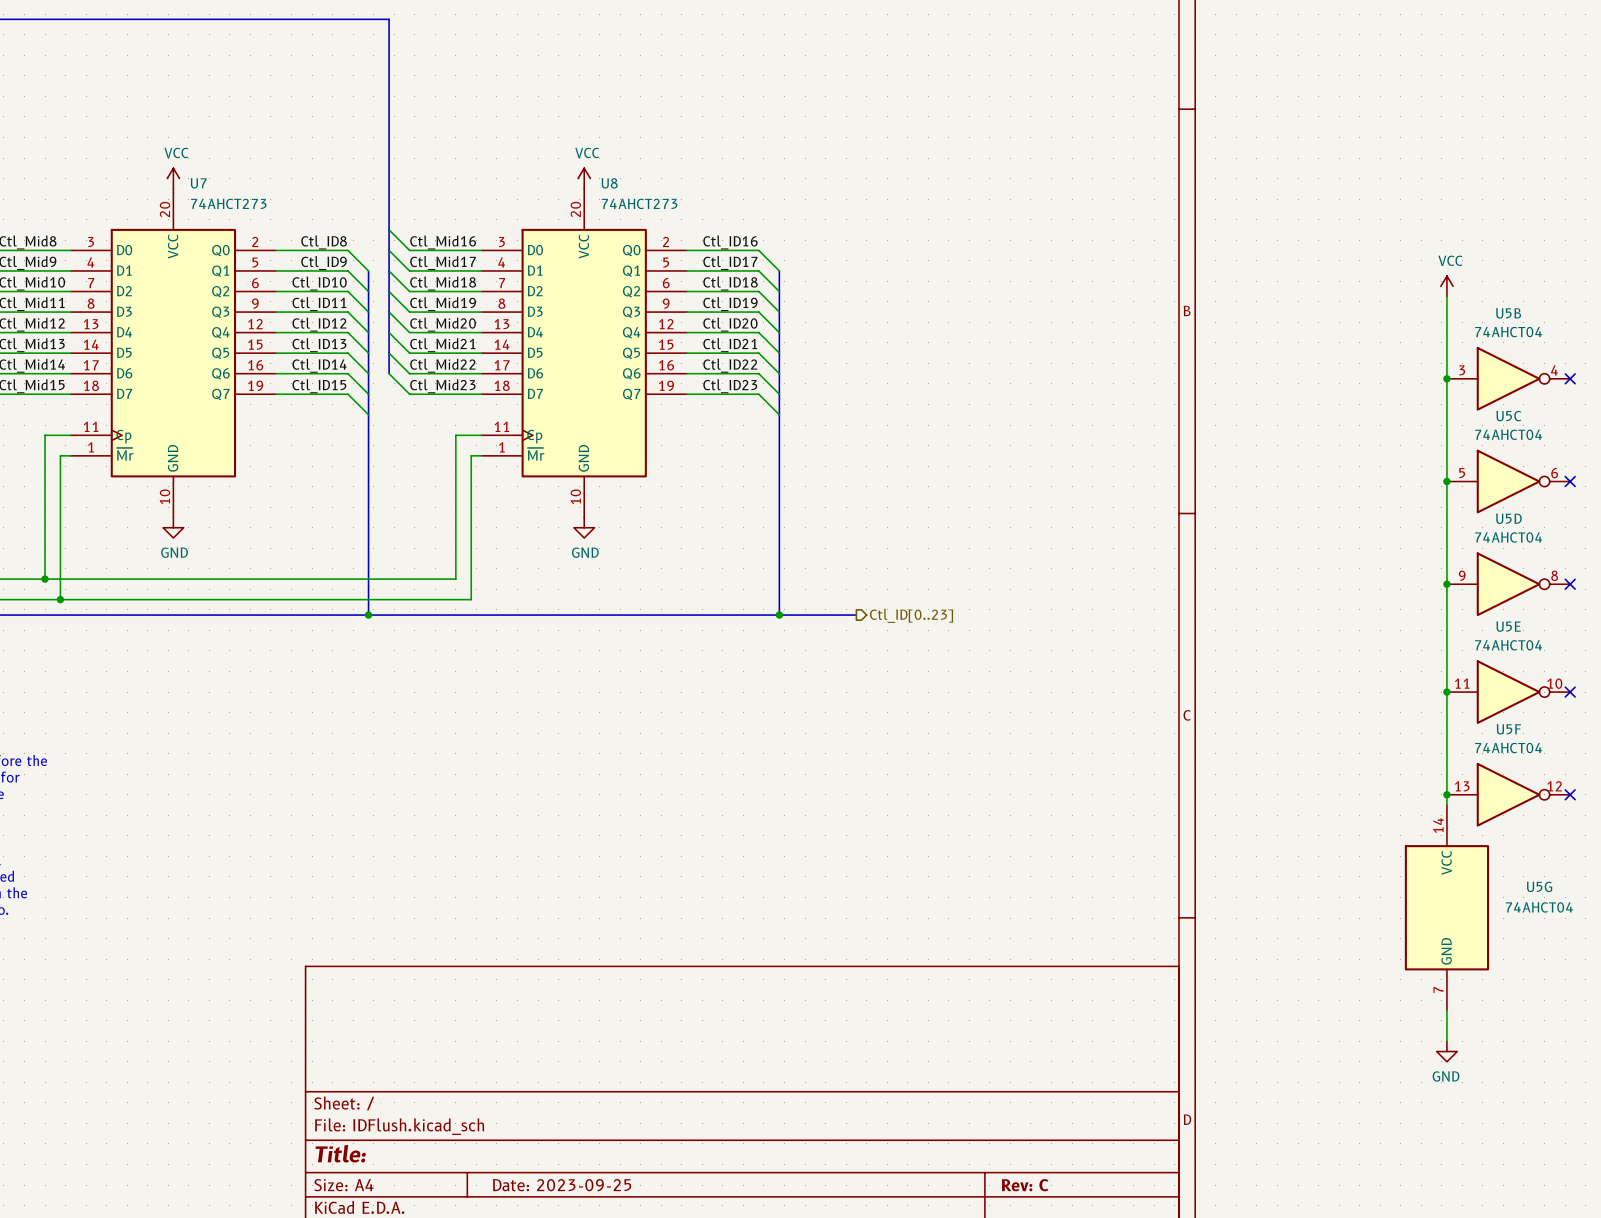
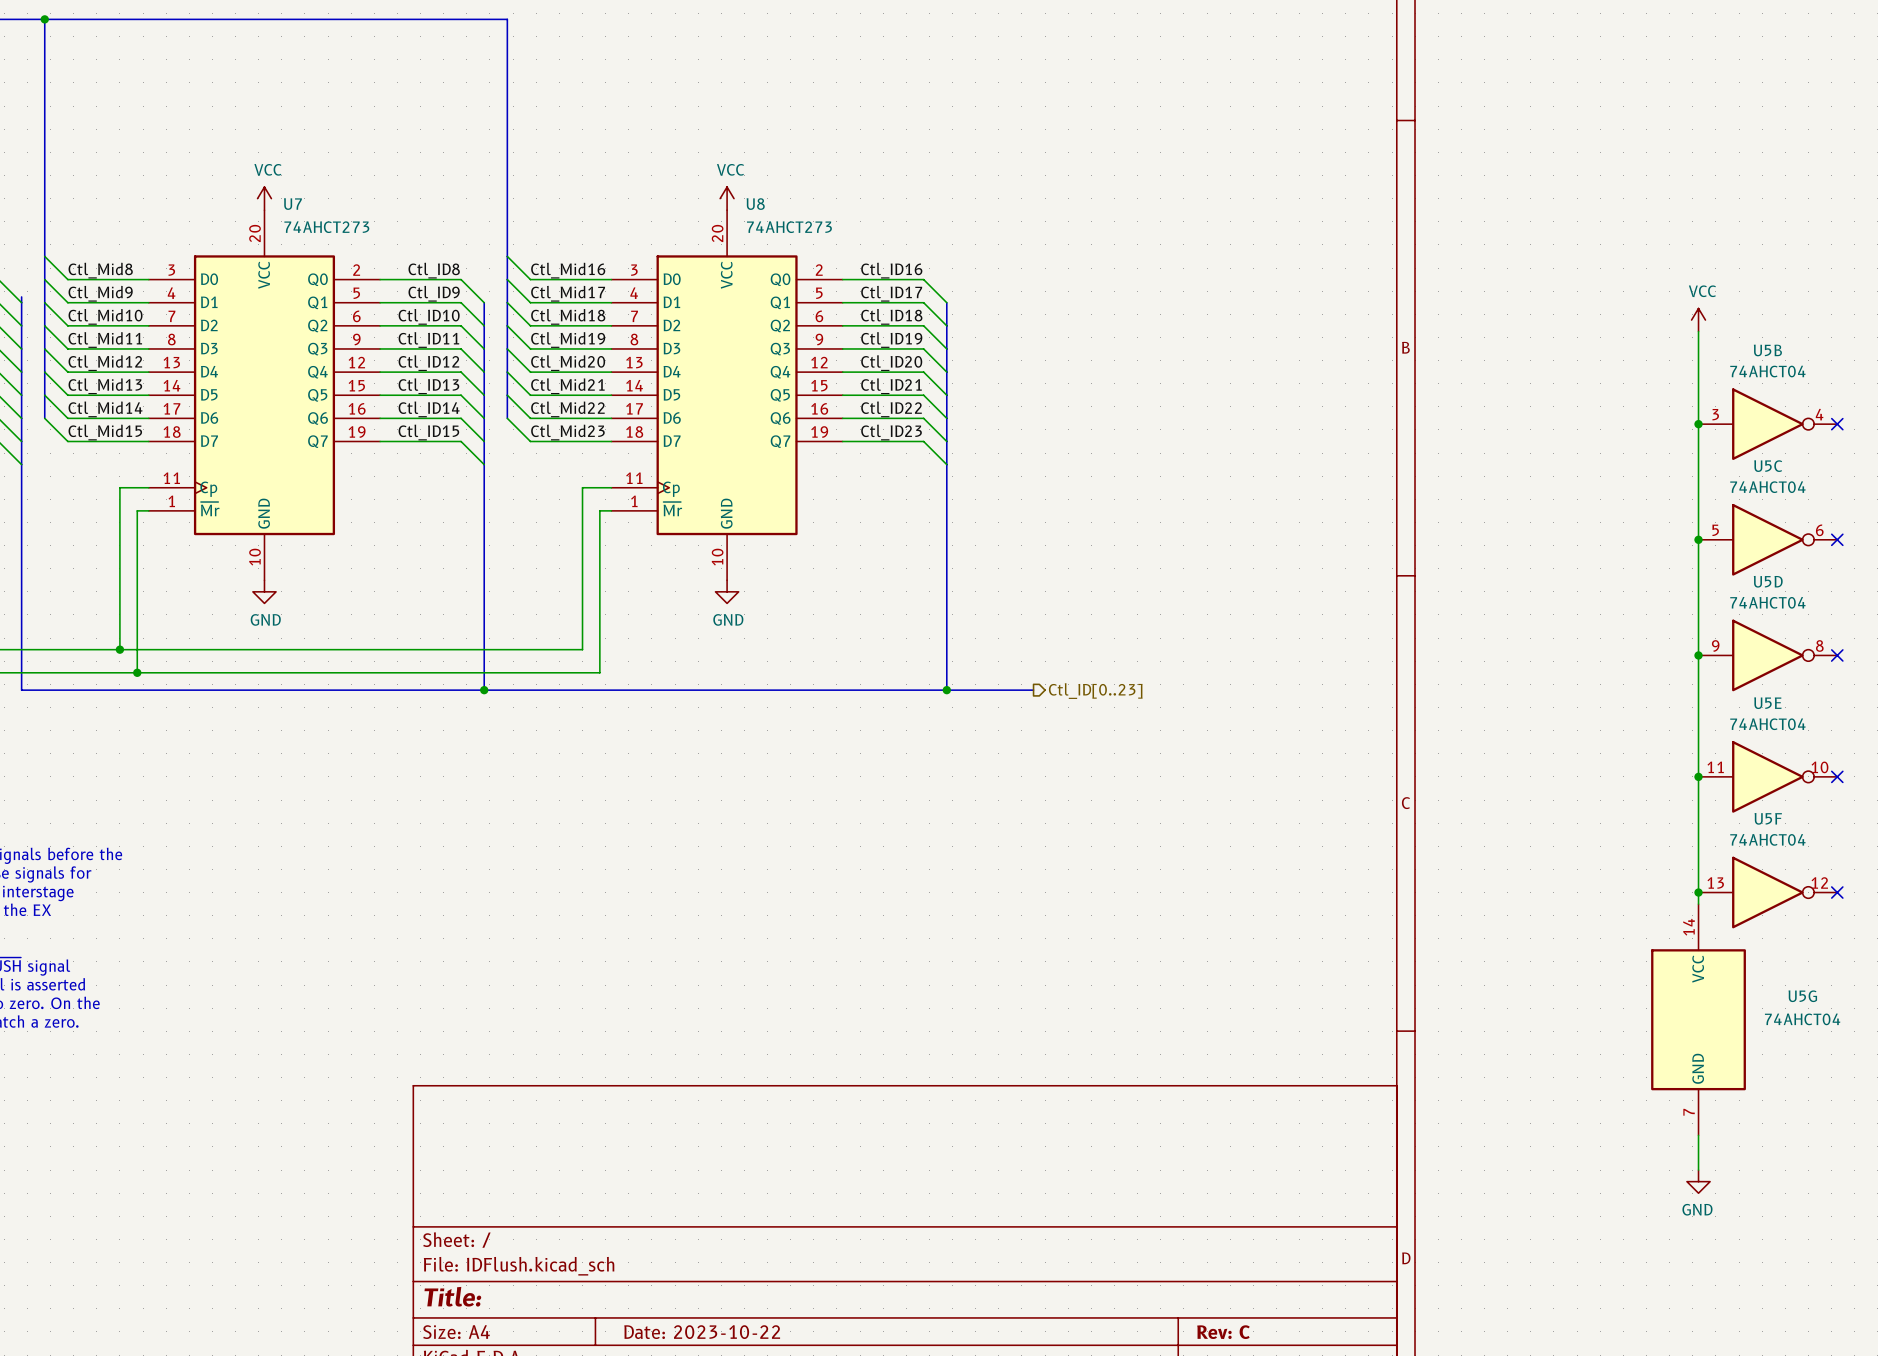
title block: Date: 2023-09-25 (562, 1185) -> Date: 2023-10-22 (702, 1332)

